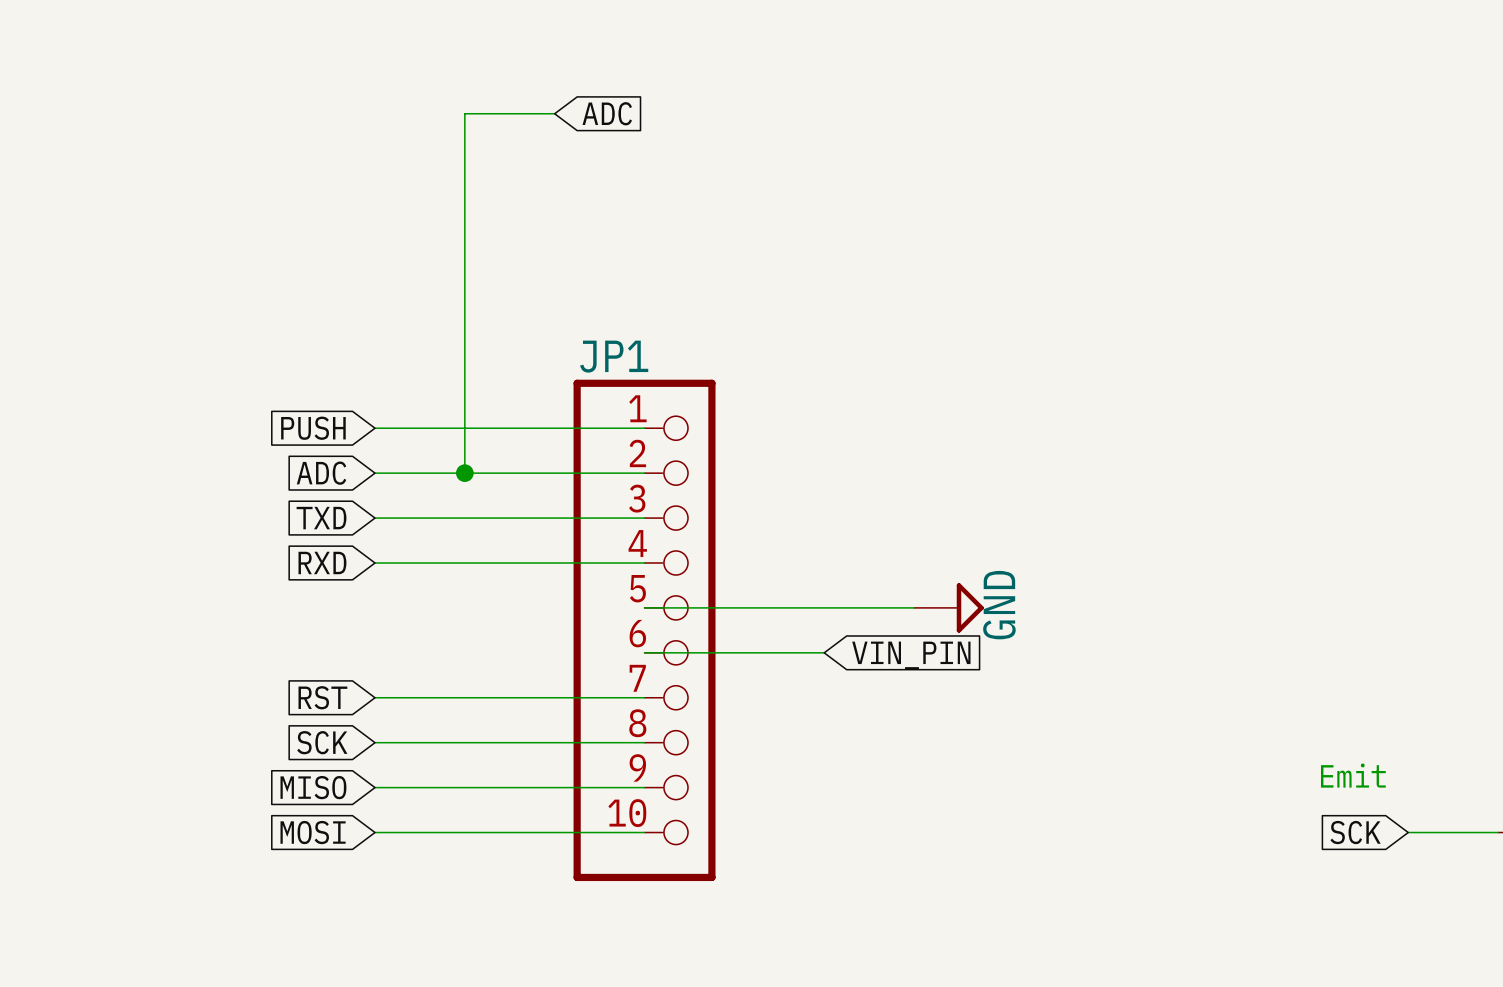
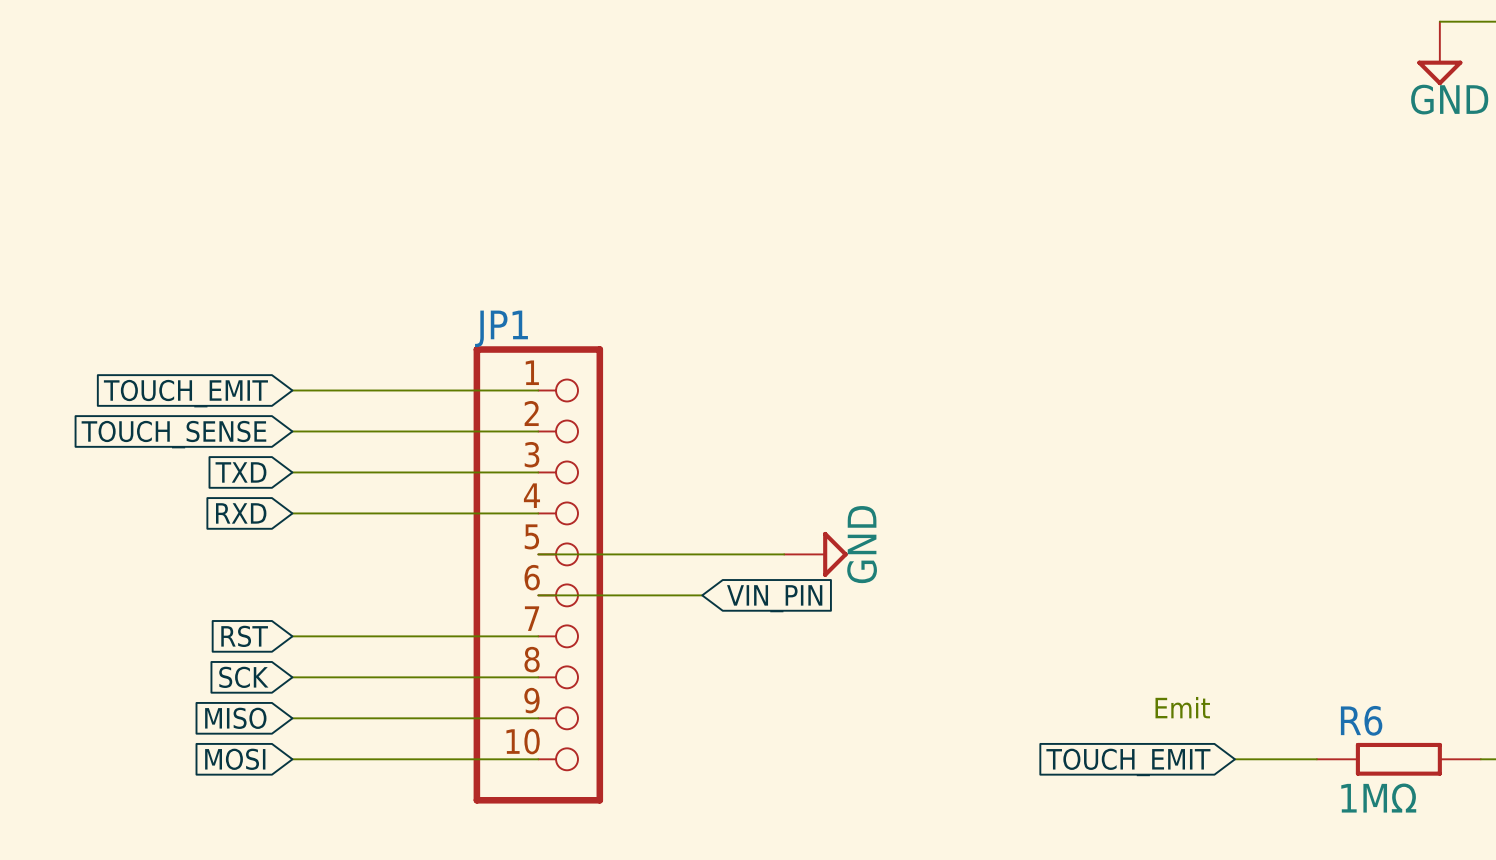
wire: (554, 113) (464, 113) (464, 473) -> none
global label: ADC (607, 113) -> none
global label: PUSH (313, 428) -> TOUCH_EMIT (185, 393)
global label: ADC (321, 473) -> TOUCH_SENSE (173, 434)
junction: (464, 473) -> none
global label: SCK (1355, 832) -> TOUCH_EMIT (1128, 762)

